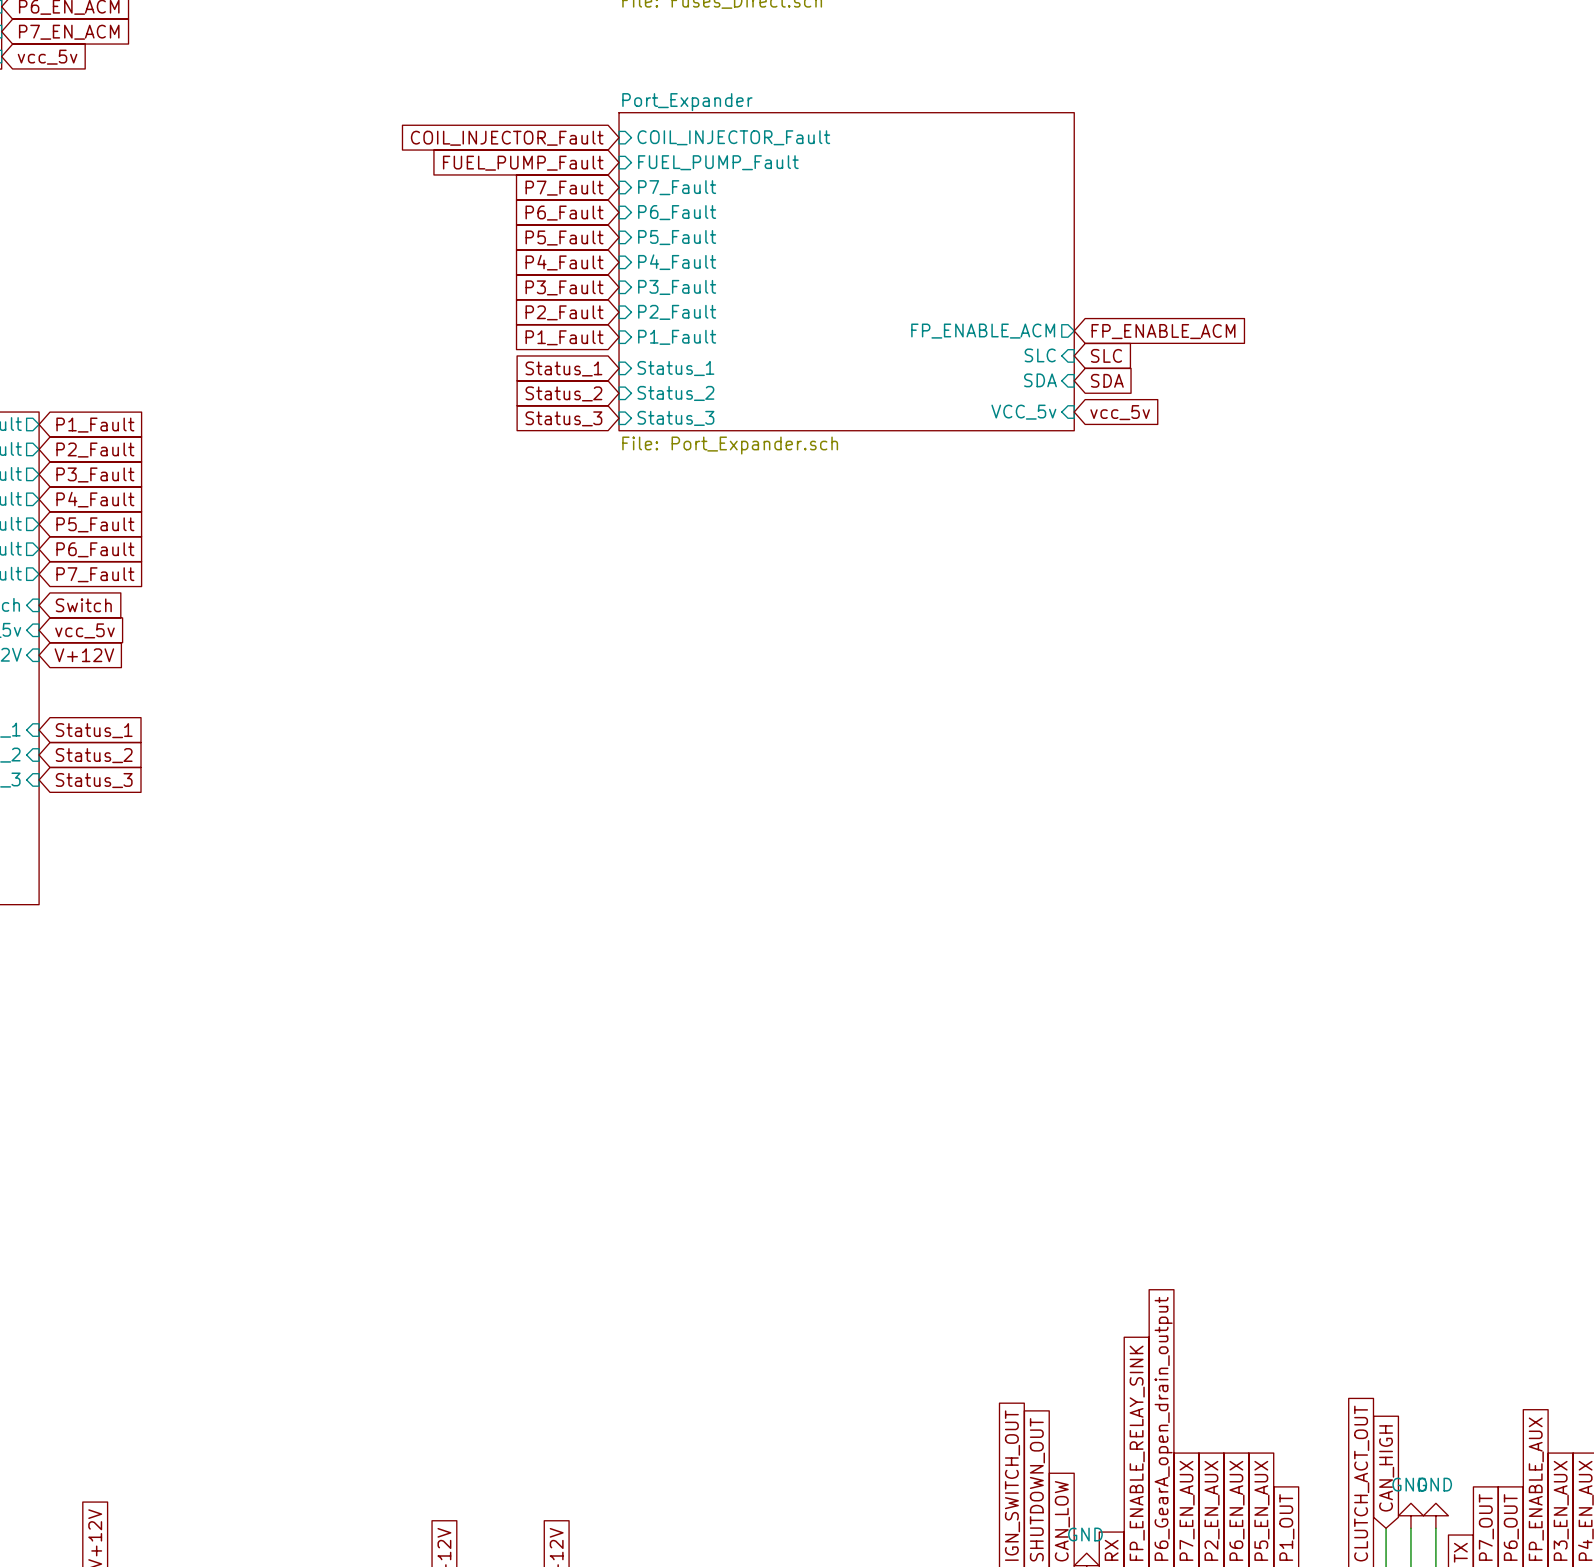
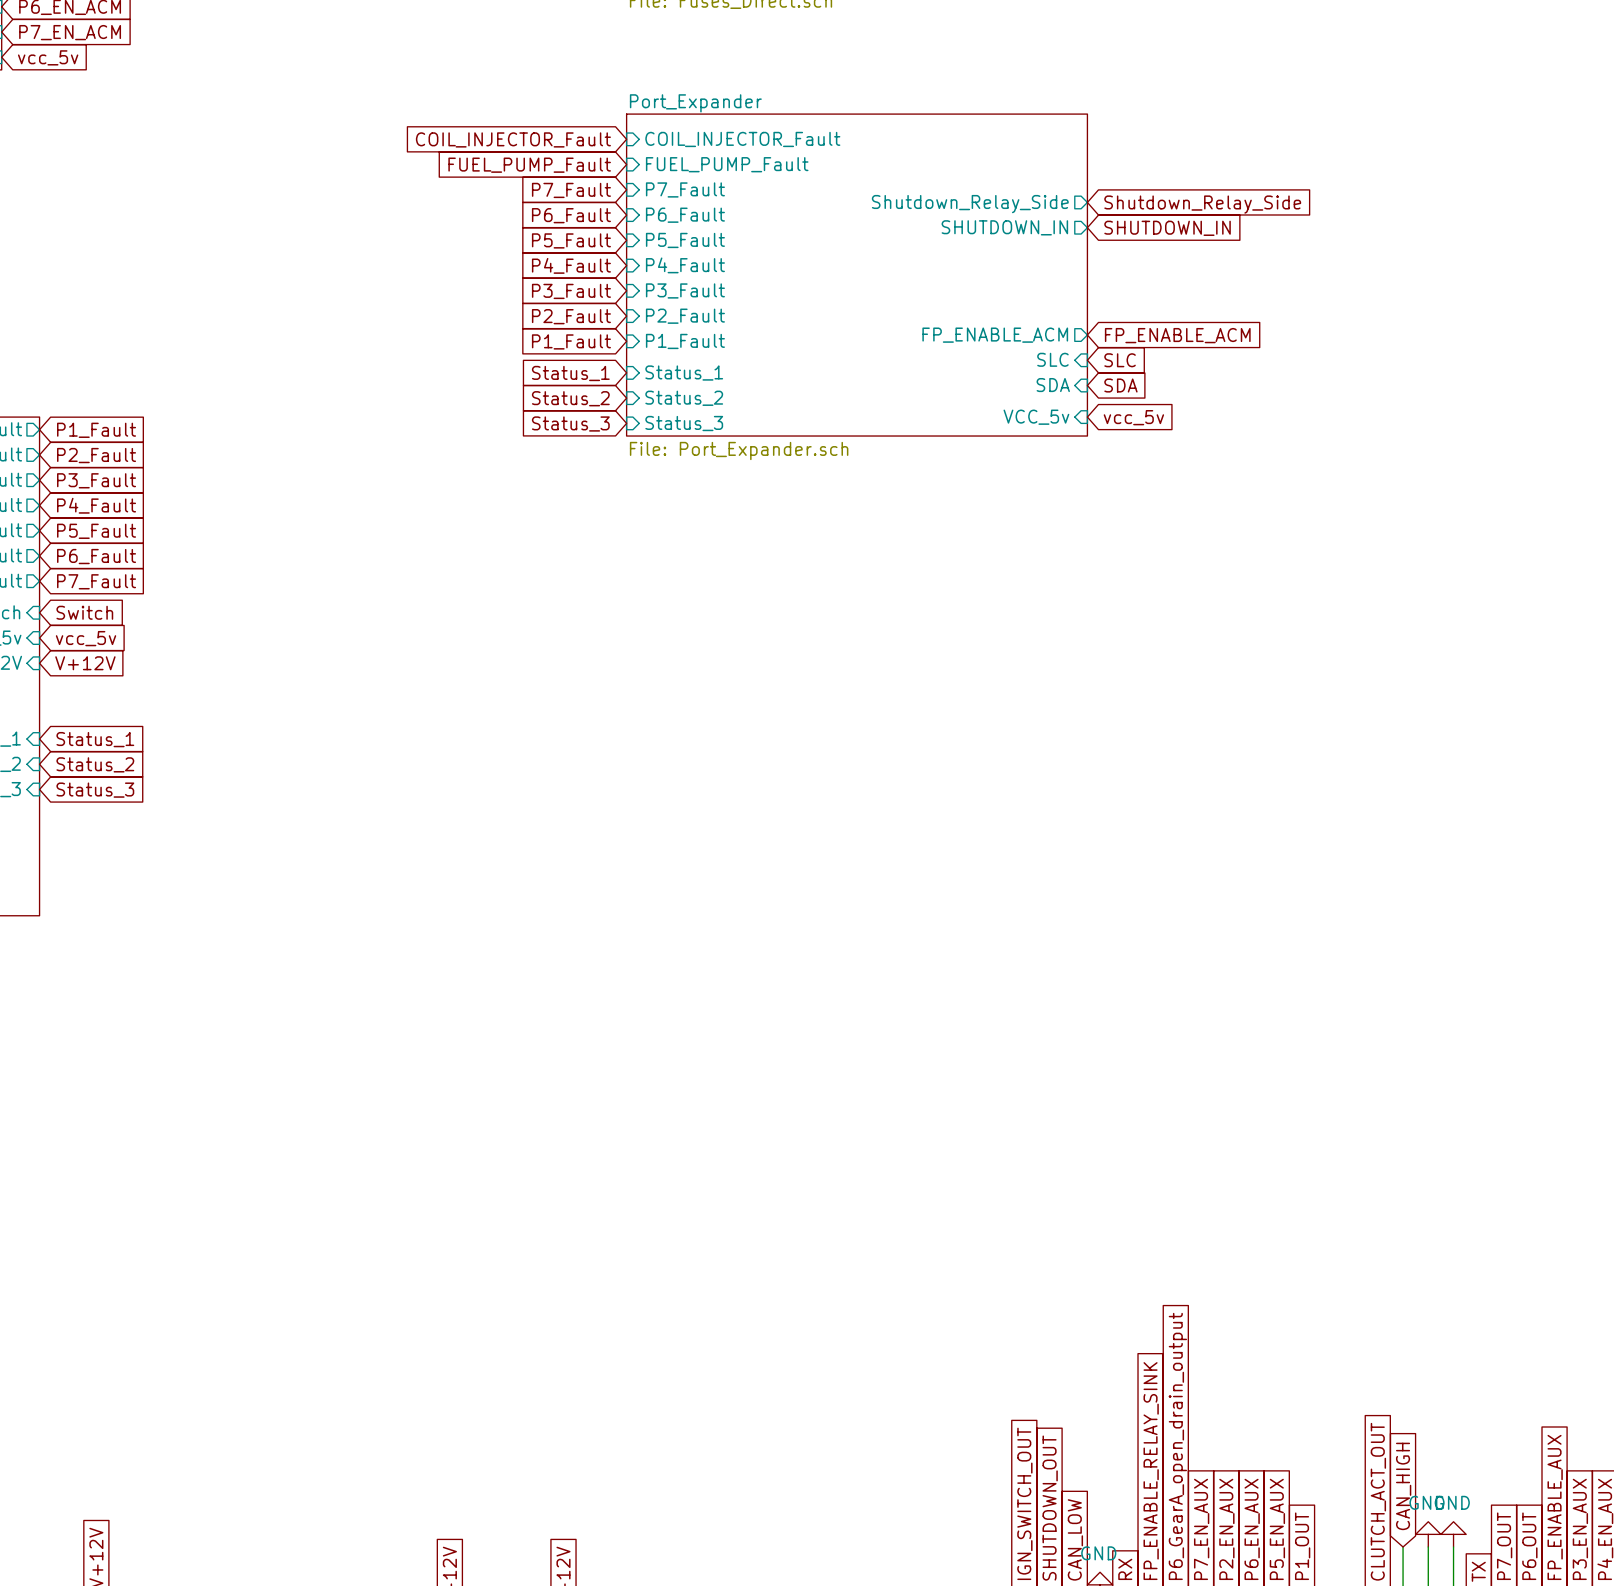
sheet pin: none -> Shutdown_Relay_Side (970, 204)
global label: none -> Shutdown_Relay_Side (1202, 204)
sheet pin: none -> SHUTDOWN_IN (1004, 227)
global label: none -> SHUTDOWN_IN (1167, 228)

